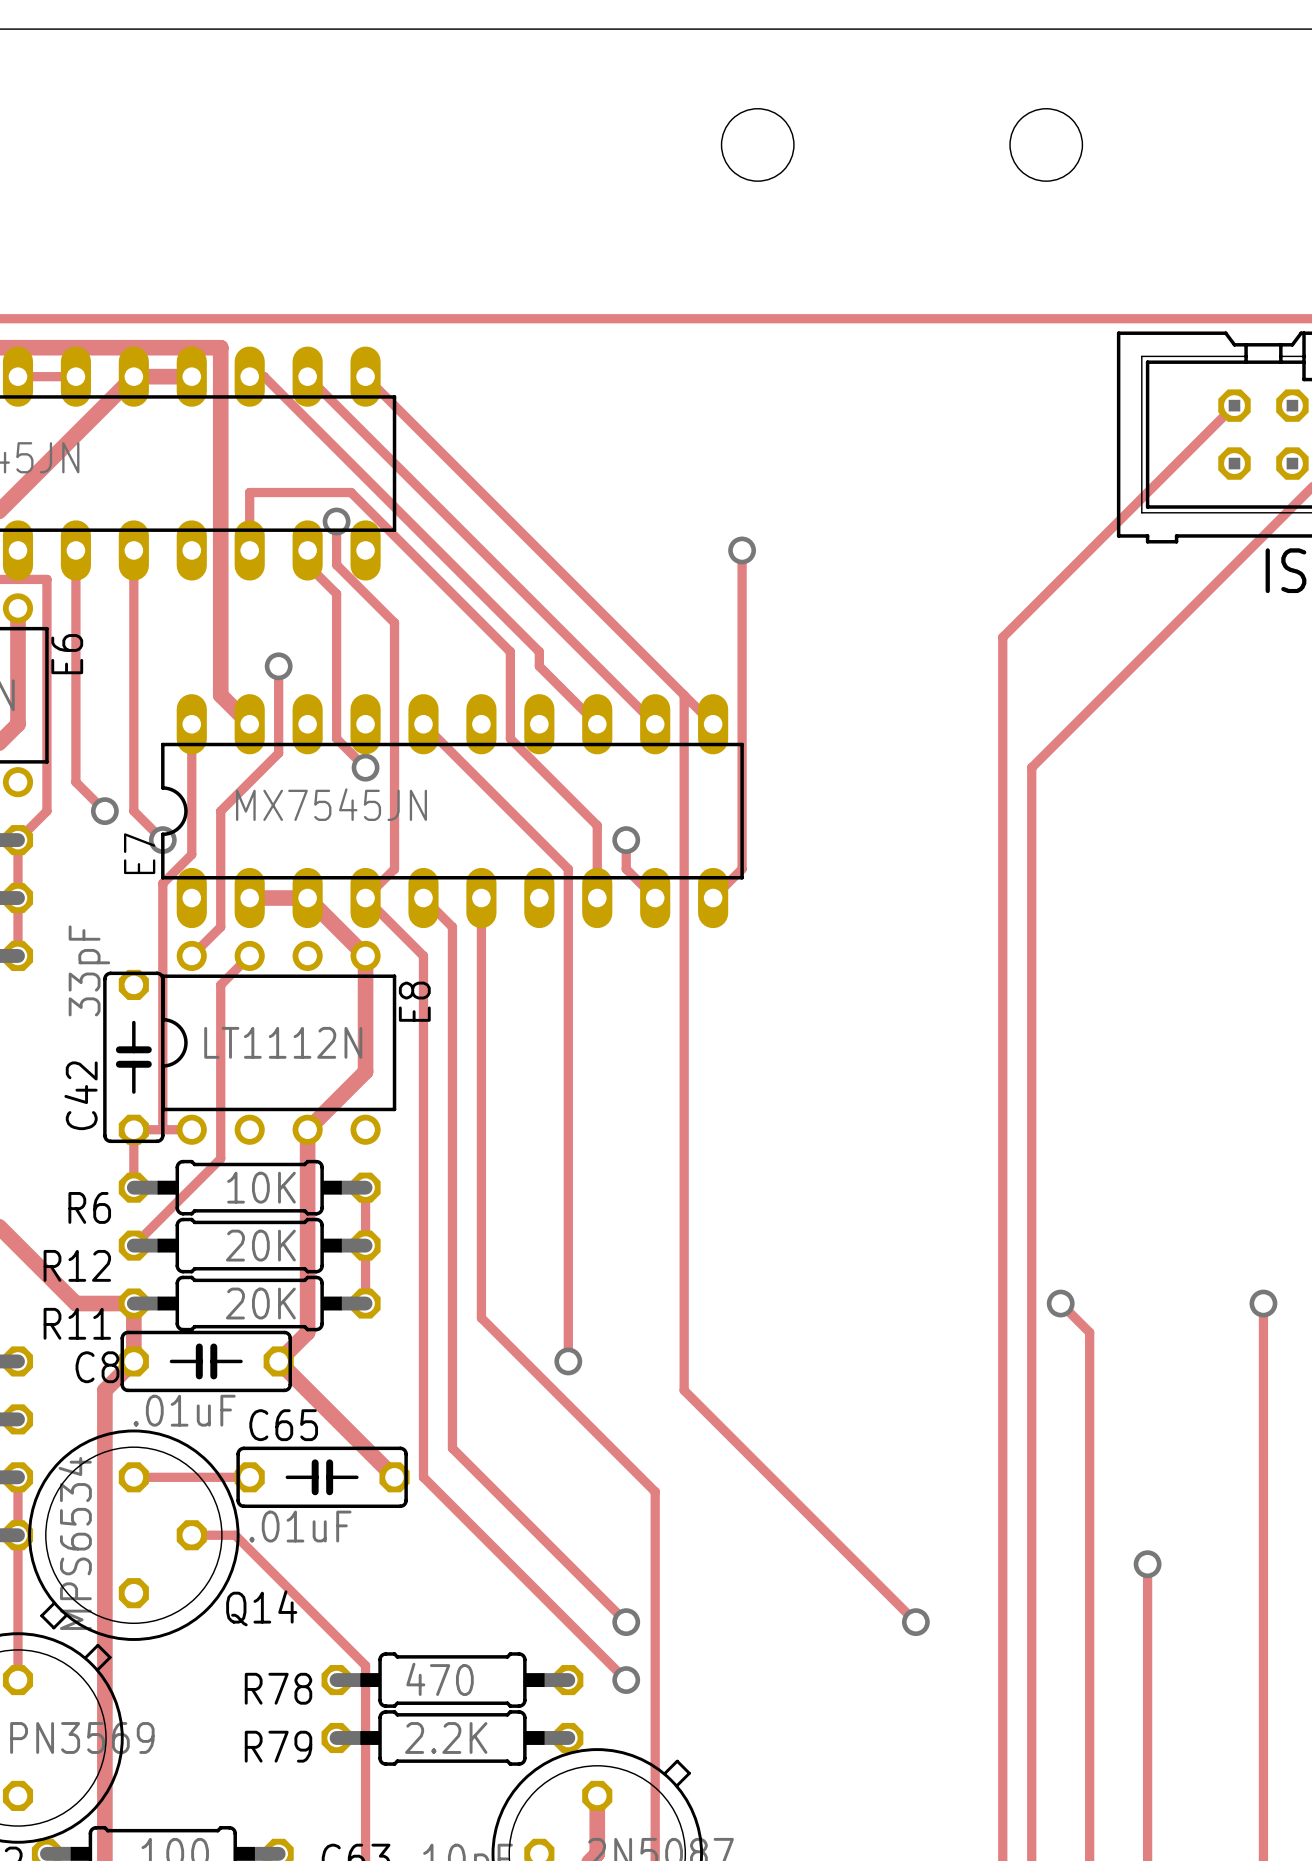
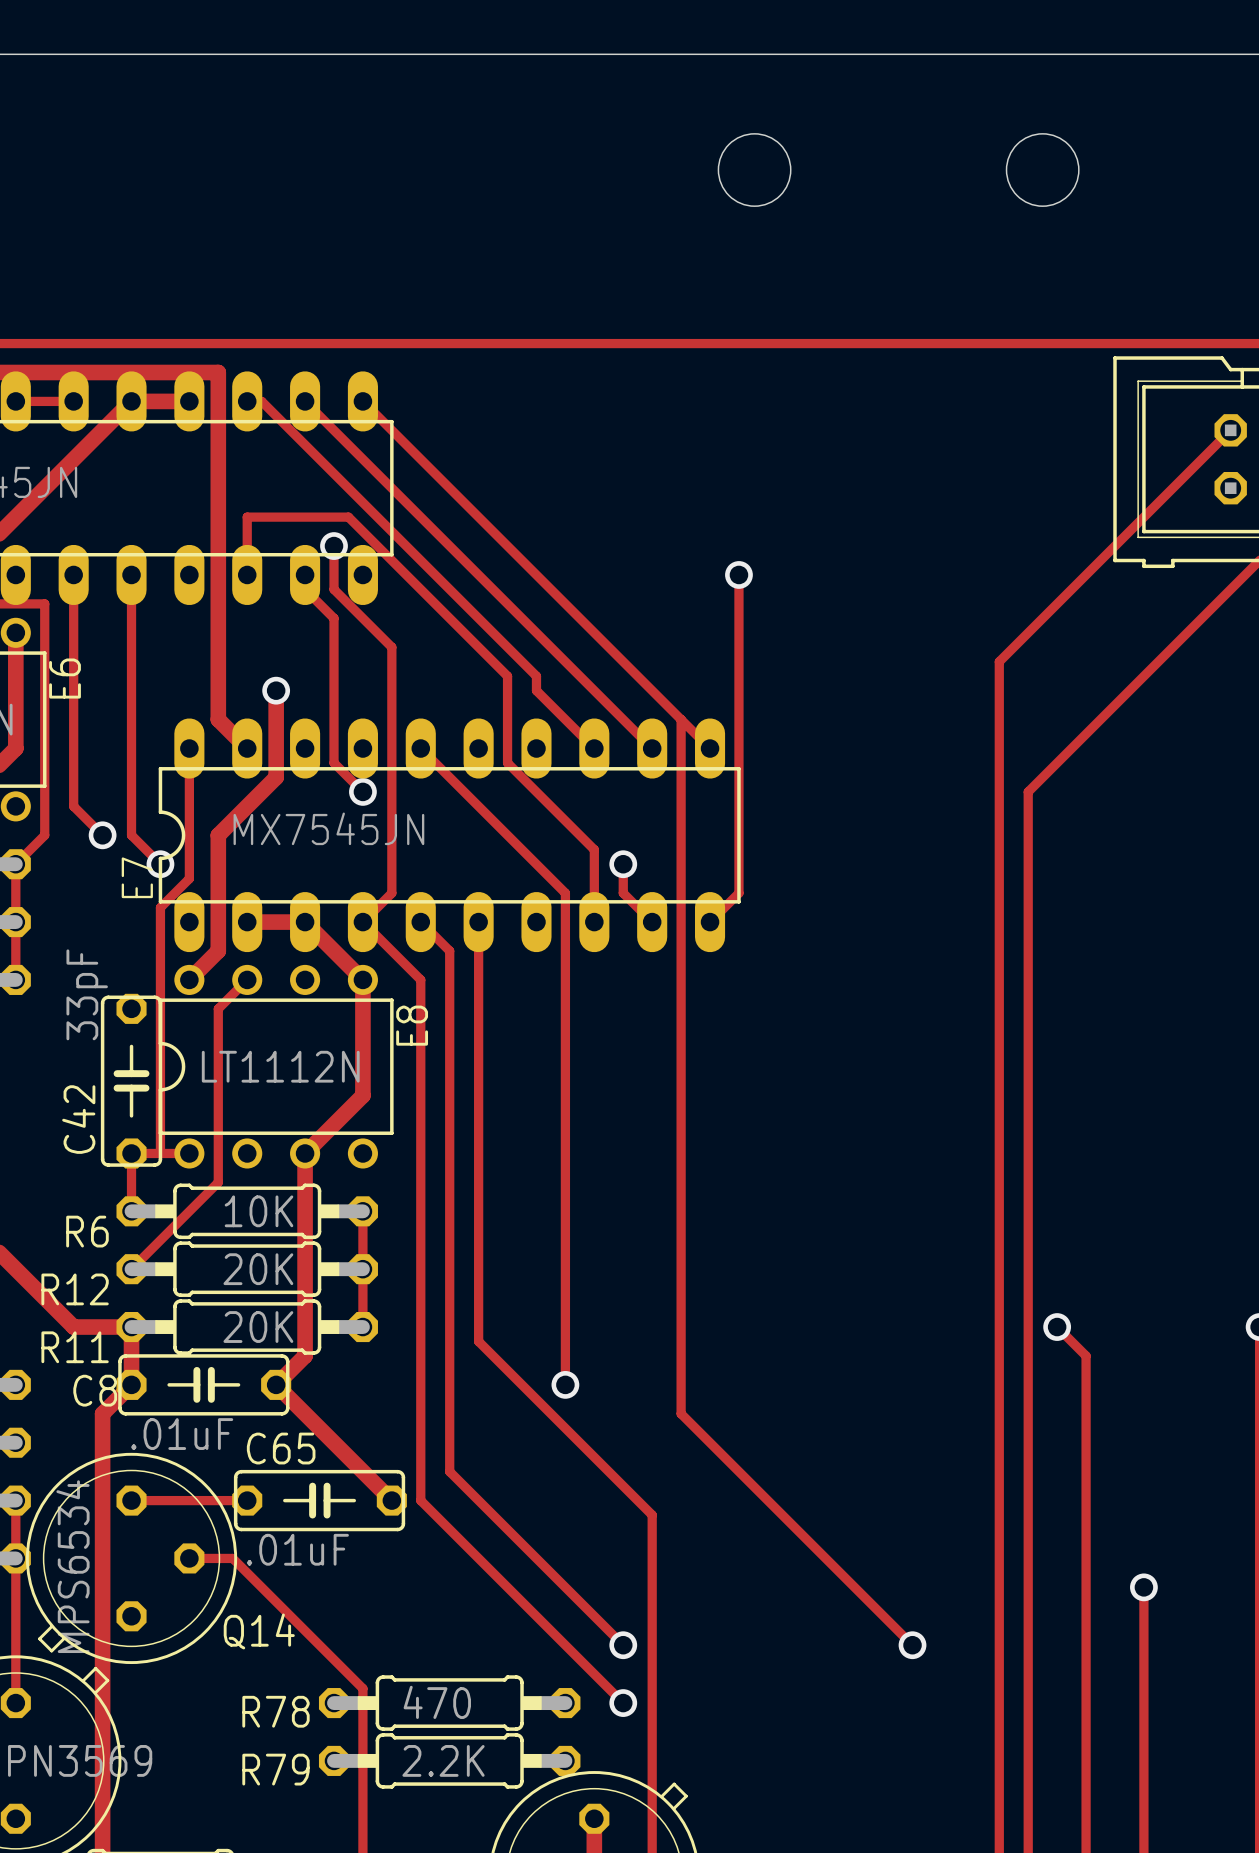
track width: thin (278, 666) (278, 753) (220, 811) (220, 926) (191, 955) -> thick (276, 690) (276, 777) (218, 835) (218, 951) (189, 979)

